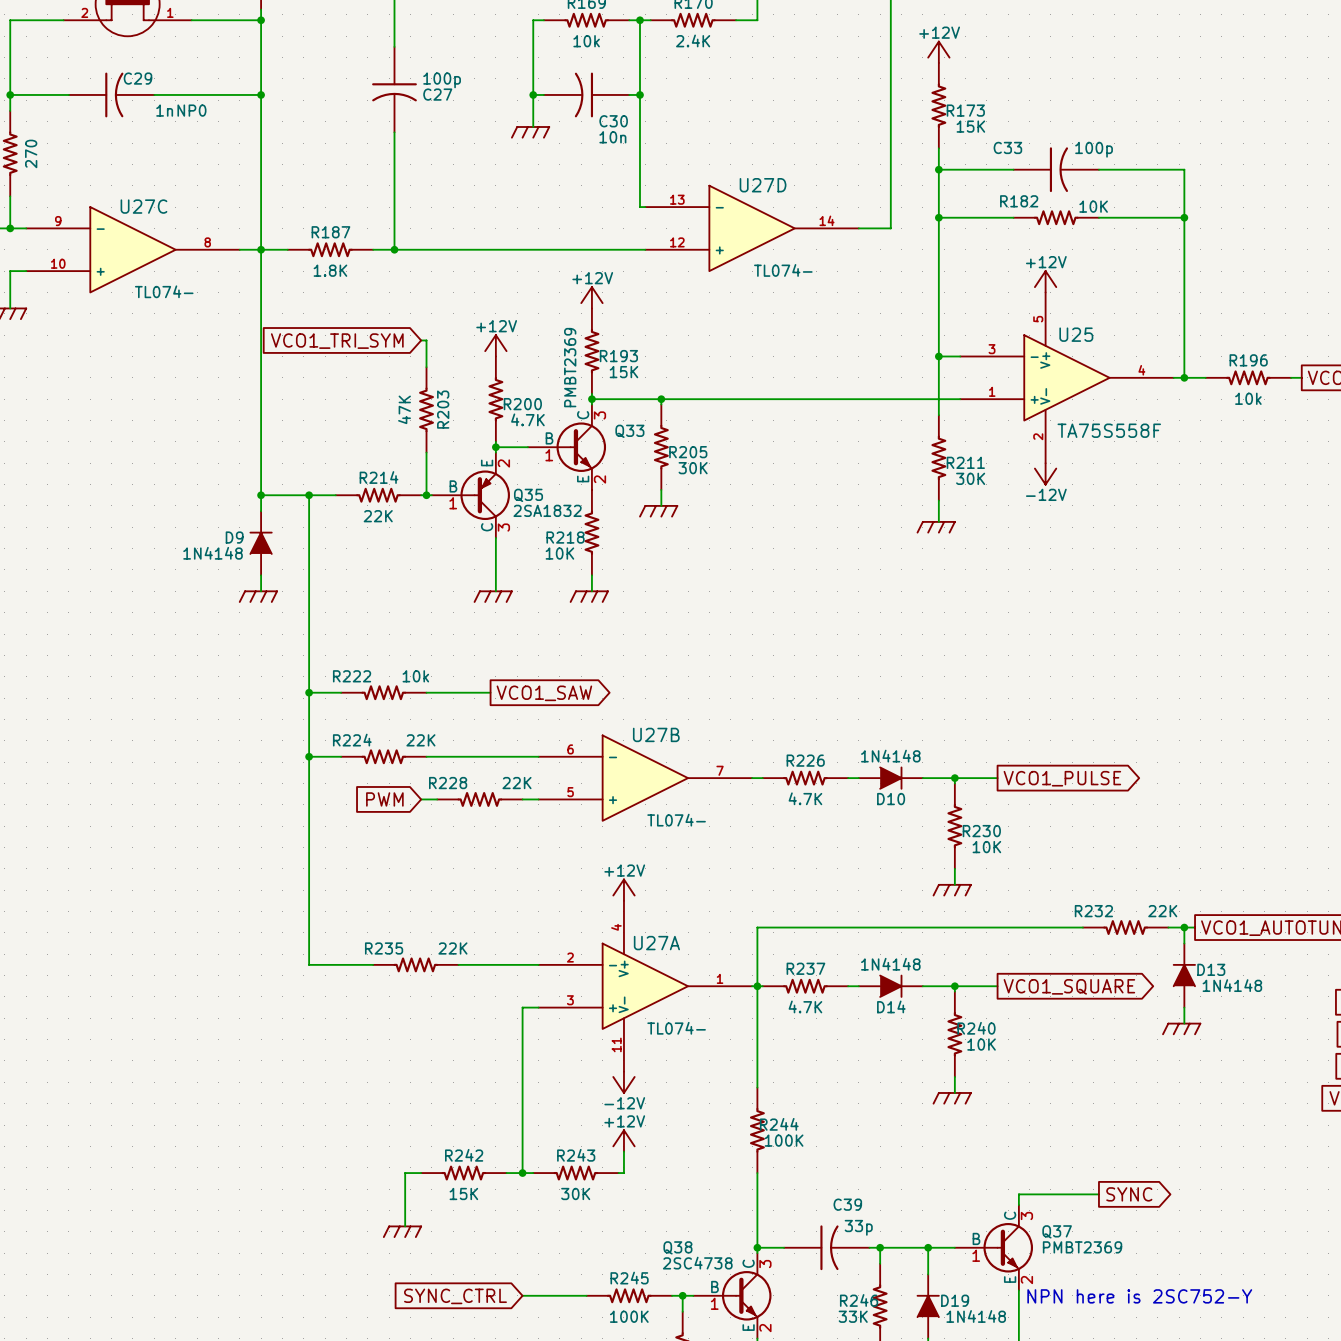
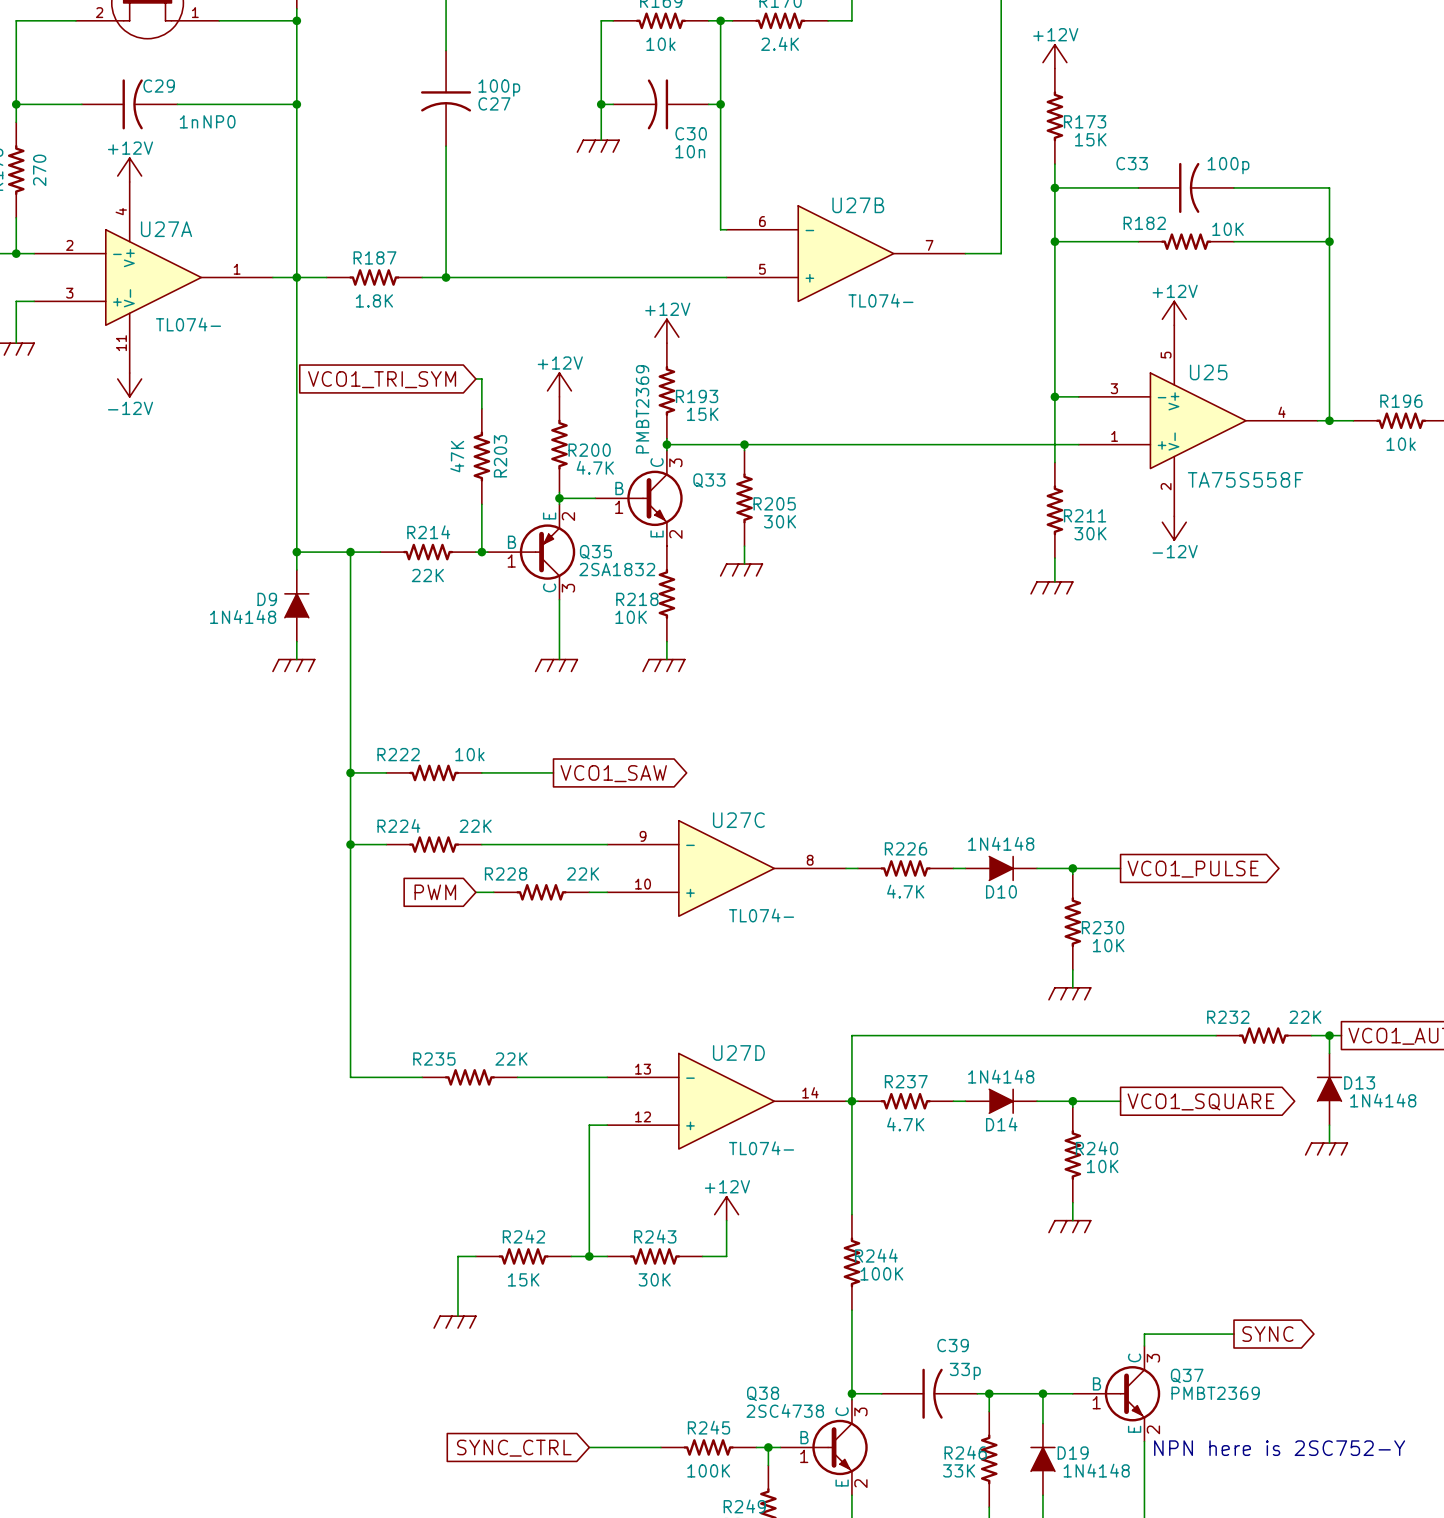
power symbol: none -> +12V (129, 170)
U27D position: (752, 228) -> (726, 1101)
U27C position: (132, 249) -> (726, 868)
power symbol: none -> -12V (129, 384)
U27B position: (645, 778) -> (845, 253)
power symbol: +12V (623, 890) -> none
U27A position: (645, 986) -> (153, 277)
power symbol: -12V (623, 1082) -> none
wire: none -> (726, 1220) (726, 1256) (702, 1256)
wire: none -> (571, 1256) (607, 1256)
wire: (522, 1125) (522, 1173) -> none
power symbol position: +12V (623, 1141) -> +12V (726, 1208)
wire: (623, 1151) (623, 1173) (618, 1173) -> none
wire: (405, 1173) (421, 1173) -> (457, 1310) (457, 1256) (475, 1256)
R242 position: (463, 1173) -> (523, 1256)
wire: (506, 1173) (533, 1173) -> none
junction position: (522, 1173) -> (589, 1256)
R243 position: (575, 1173) -> (654, 1256)
wire: (405, 1178) (405, 1226) -> none
power symbol position: (402, 1231) -> (455, 1322)

